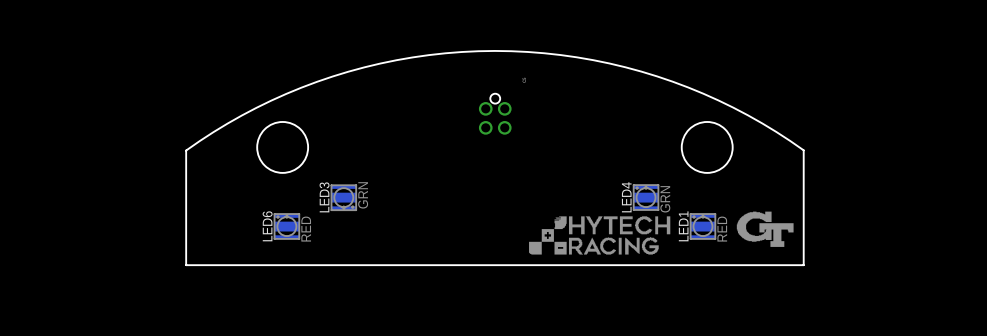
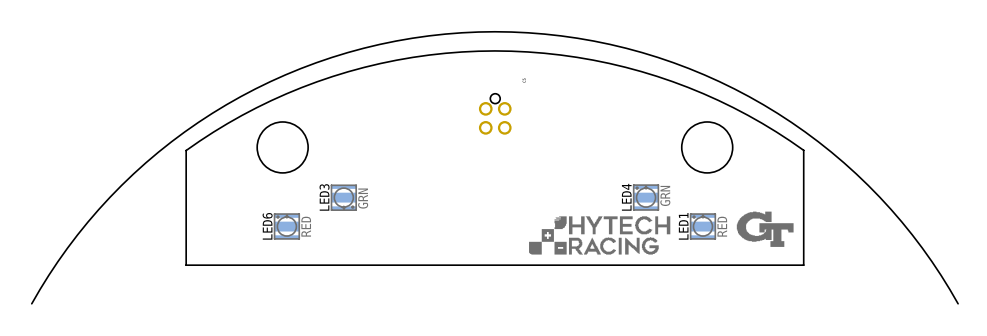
board edge: none -> (958, 303) (922, 248) (879, 197) (831, 152) (791, 122) (763, 104) (734, 88) (689, 68) (626, 48) (561, 35) (494, 31) (428, 35) (363, 48) (300, 68) (255, 88) (226, 104) (198, 122) (158, 152) (110, 197) (67, 248) (31, 303)

